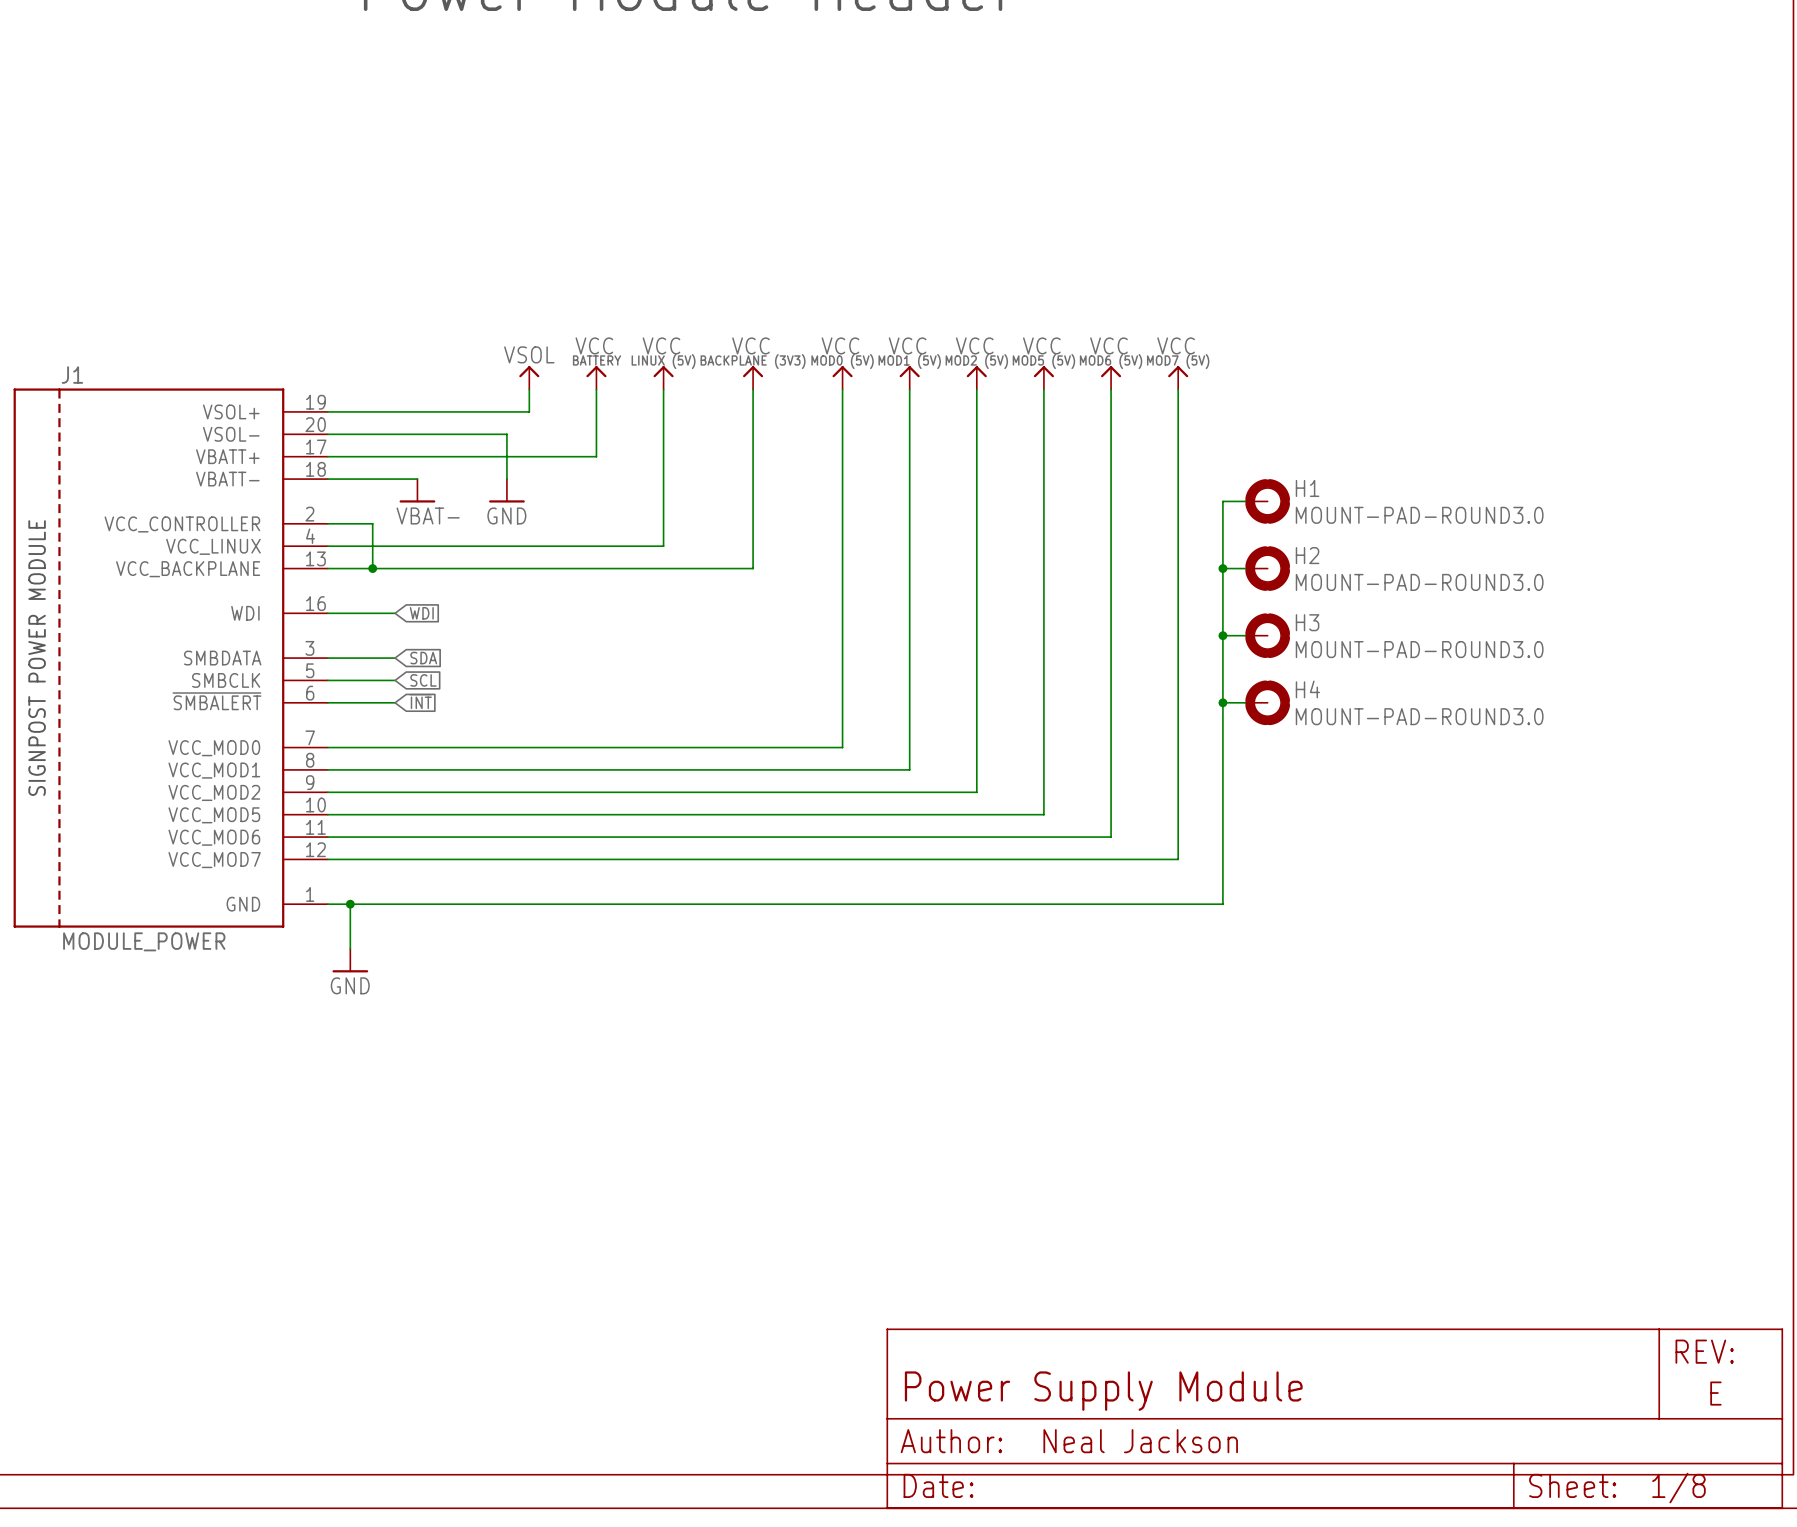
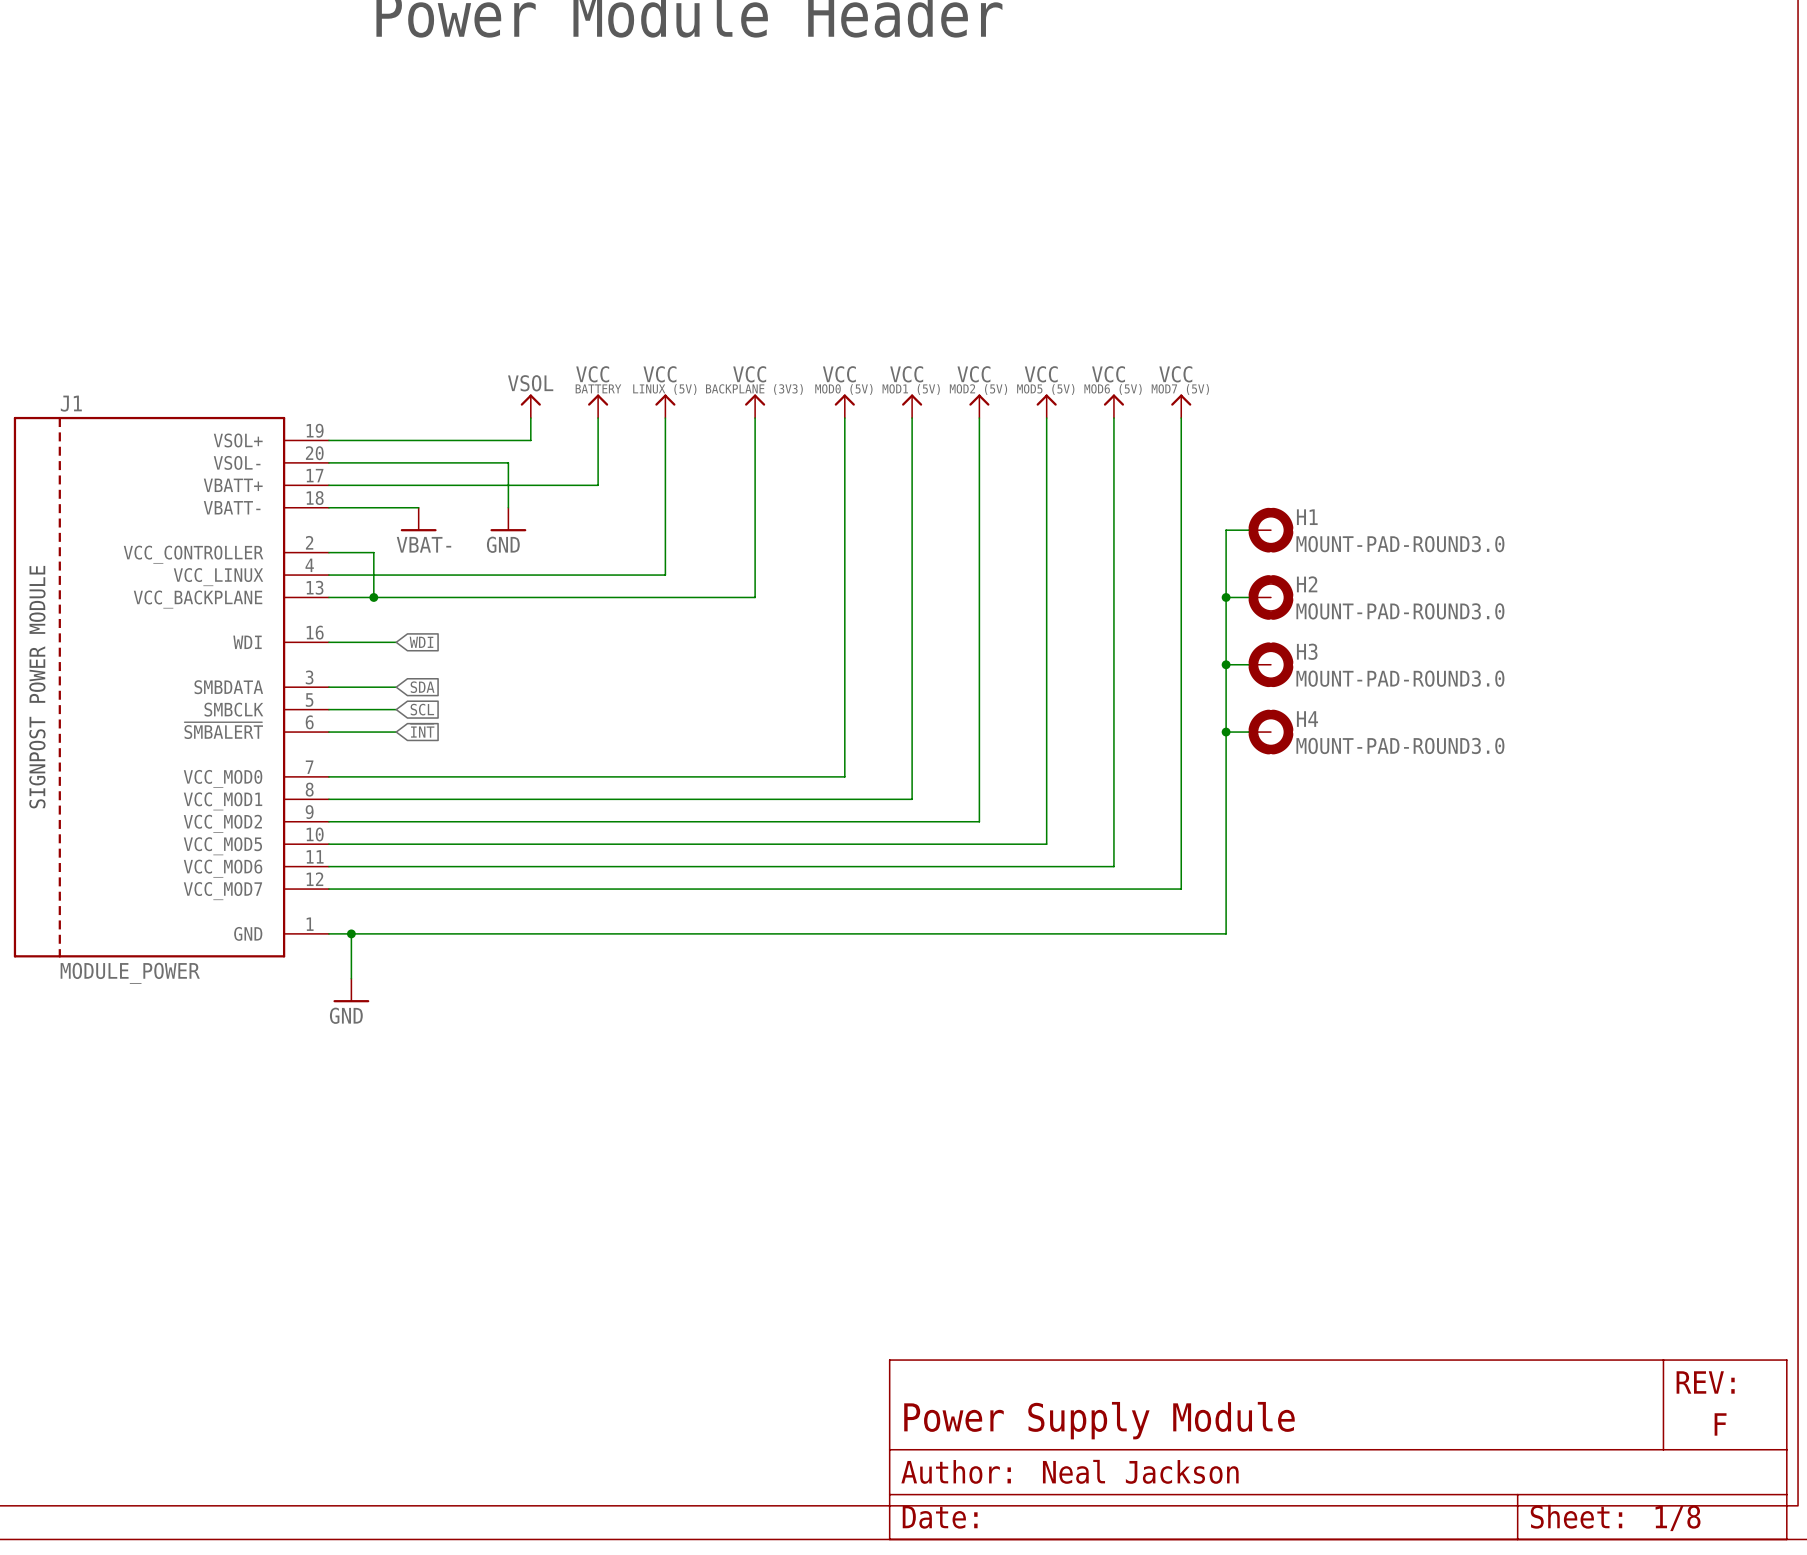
part text: E (1715, 1393) -> F (1720, 1424)

